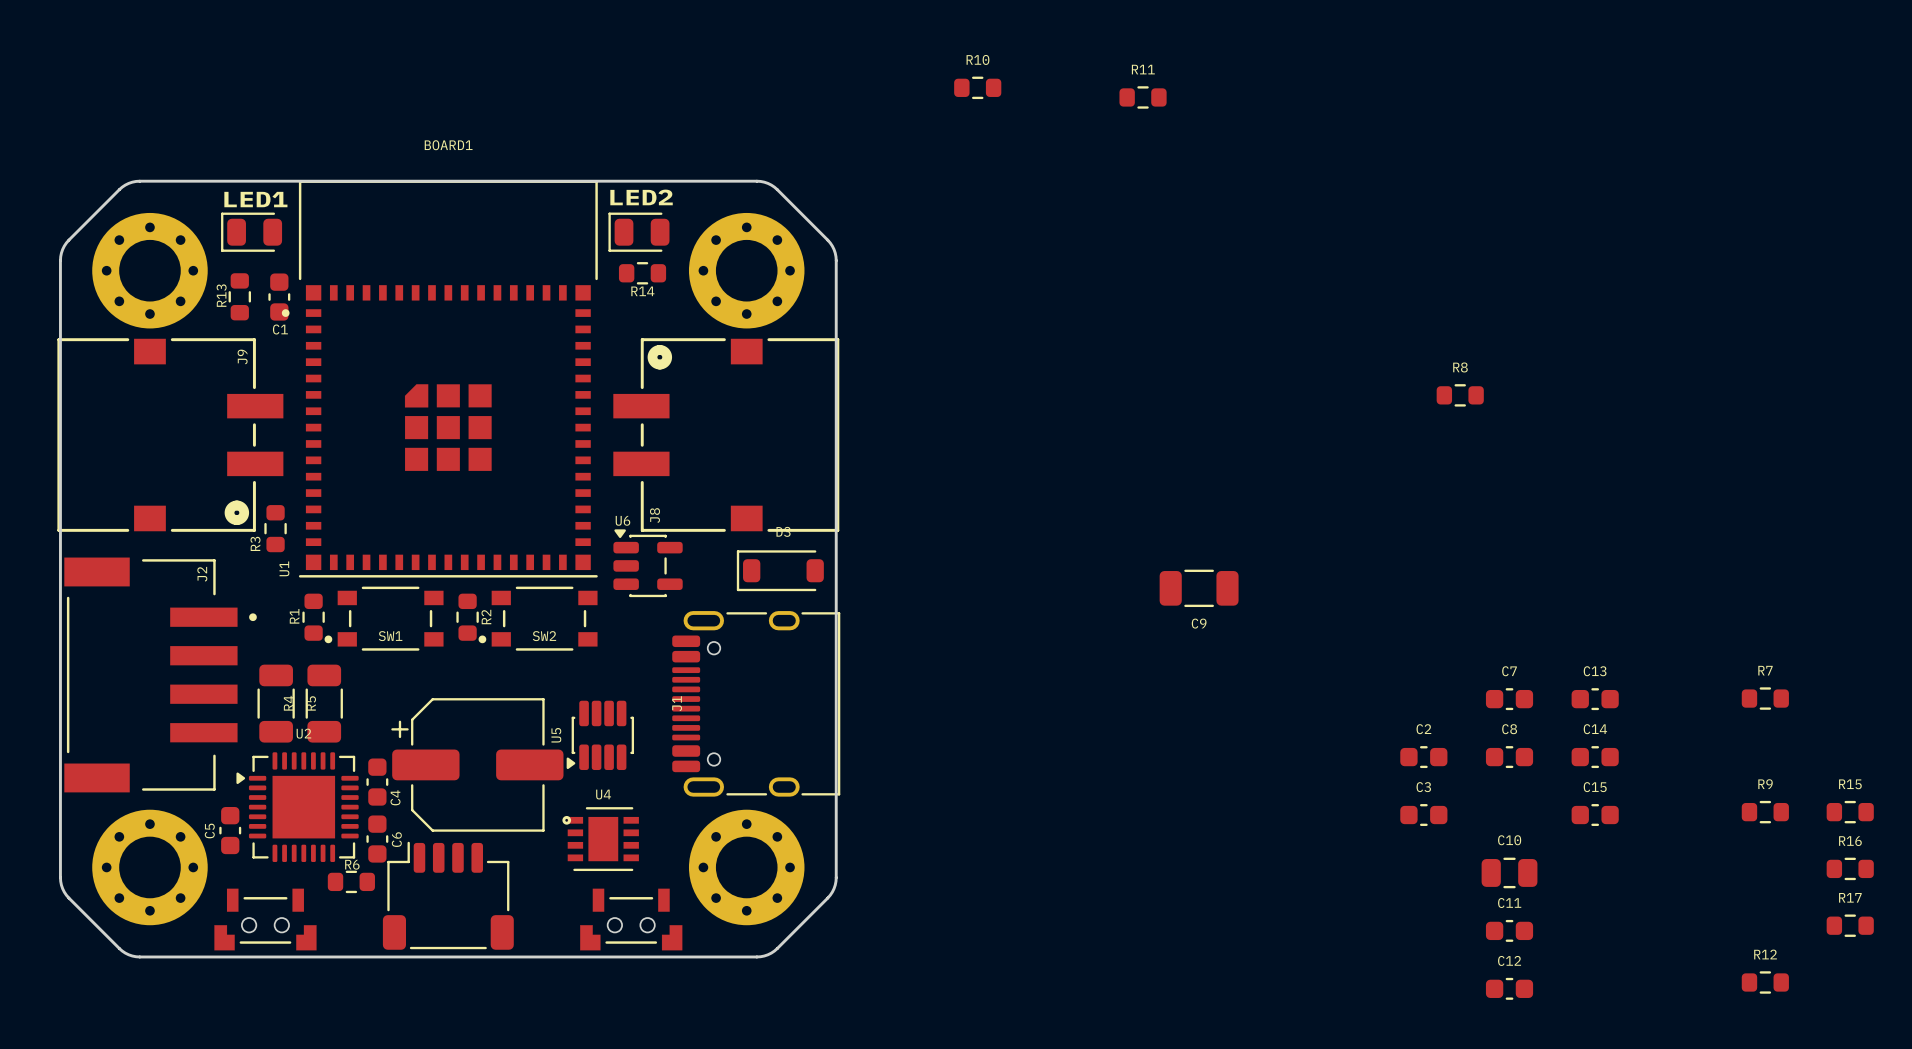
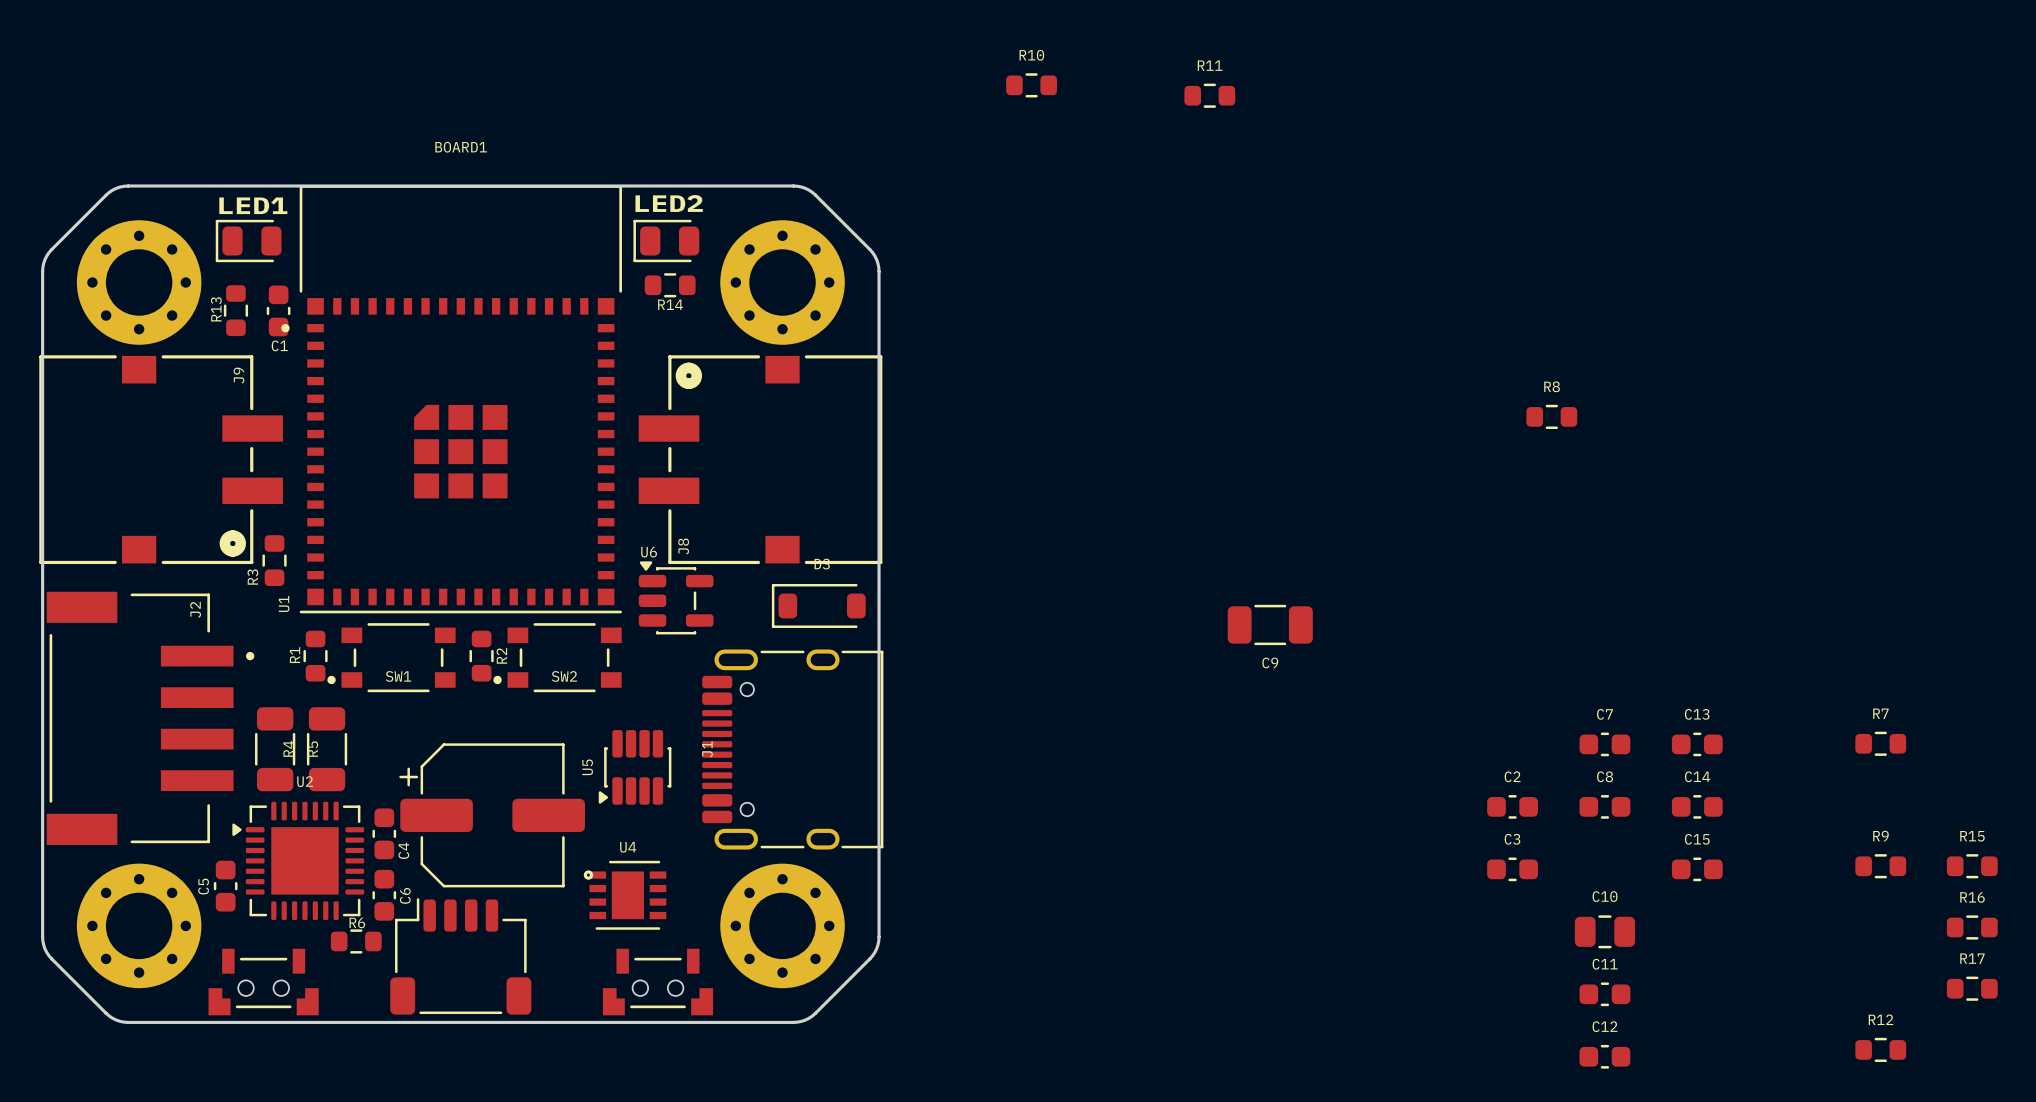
U5 position: (600, 735) -> (635, 767)

